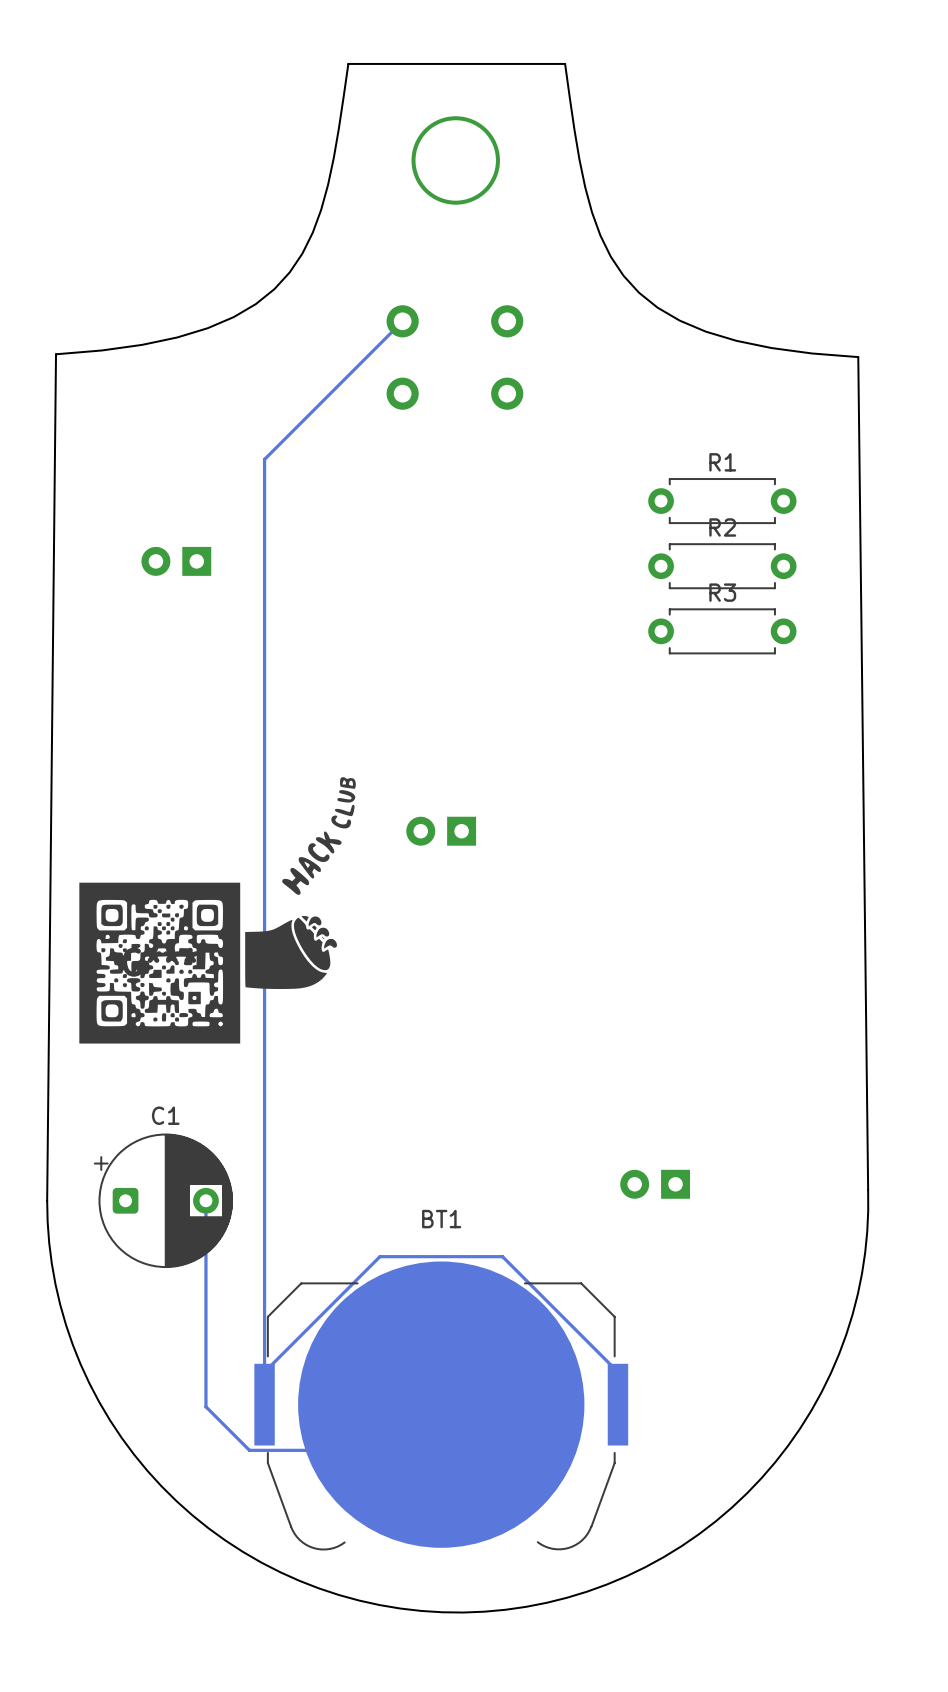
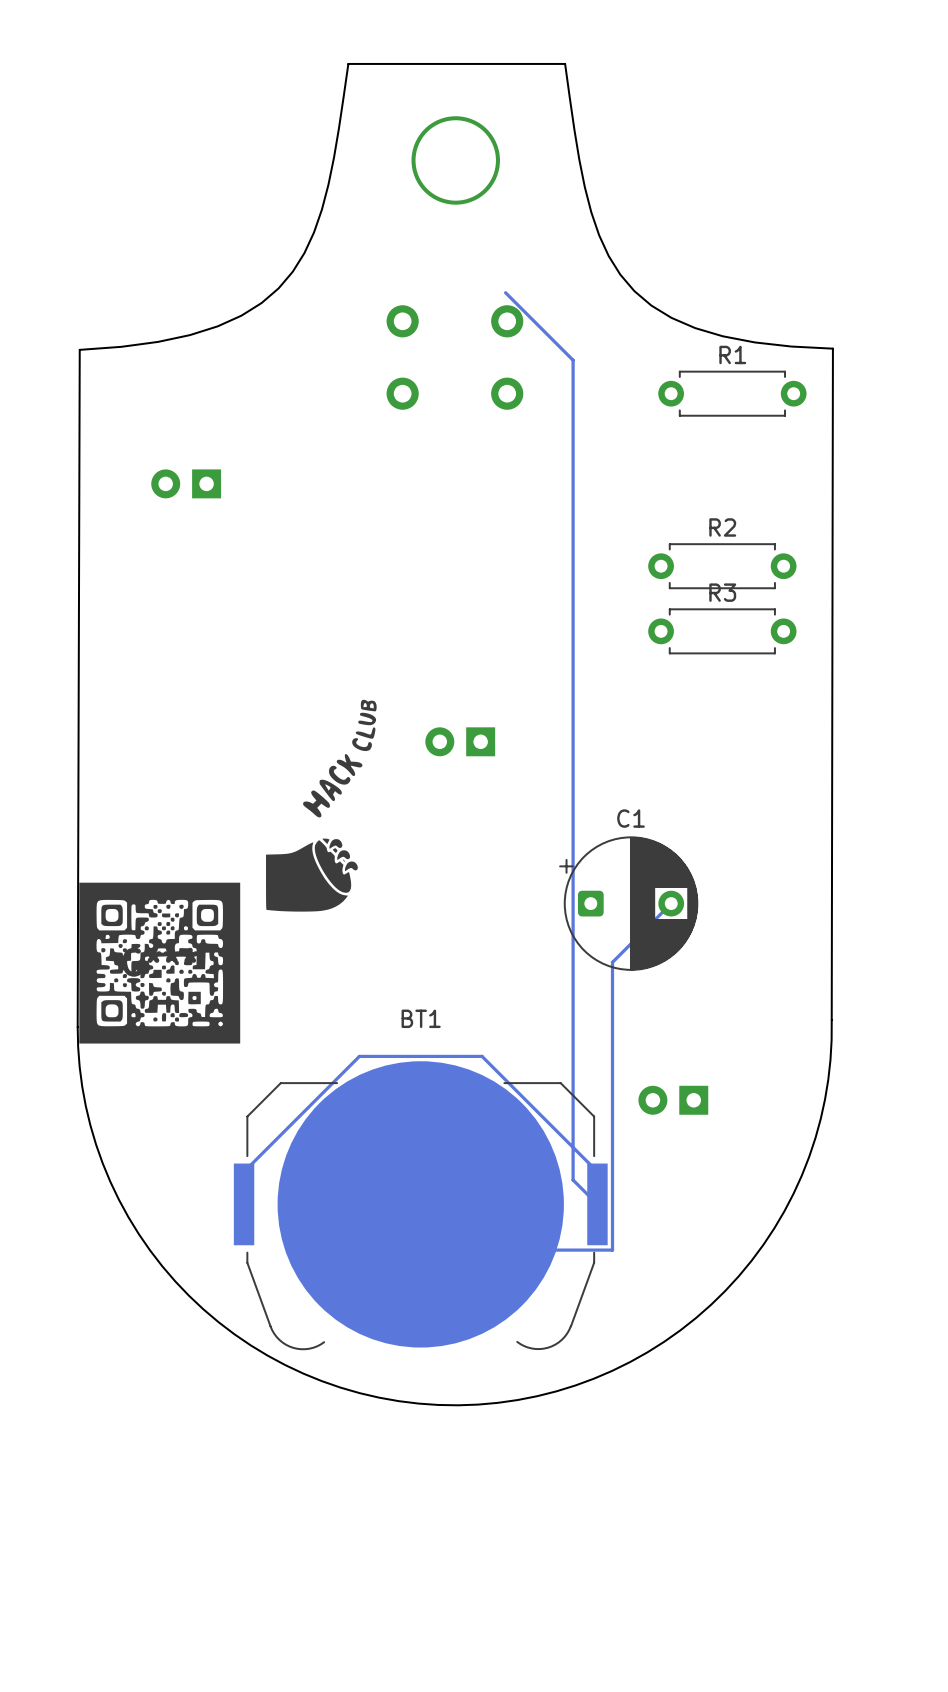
board edge: (565, 63) (579, 159) (592, 212) (610, 256) (623, 275) (638, 292) (657, 307) (679, 320) (705, 331) (736, 340) (812, 353) (858, 357) (867, 1231) (862, 1273) (852, 1314) (839, 1354) (821, 1392) (788, 1445) (761, 1478) (731, 1507) (681, 1546) (645, 1567) (606, 1584) (567, 1597) (526, 1606) (463, 1612) (400, 1608) (359, 1600) (318, 1588) (280, 1572) (243, 1552) (208, 1528) (176, 1501) (147, 1470) (121, 1437) (89, 1383) (66, 1324) (55, 1284) (49, 1242) (47, 1200) (56, 354) (101, 350) (177, 337) (207, 328) (233, 317) (255, 304) (274, 289) (289, 272) (302, 253) (321, 209) (333, 157) (348, 63) -> (831, 1020) (828, 1079) (815, 1137) (793, 1193) (763, 1244) (725, 1290) (680, 1330) (630, 1362) (594, 1378) (556, 1391) (517, 1400) (478, 1404) (418, 1403) (359, 1393) (303, 1373) (250, 1345) (218, 1322) (188, 1295) (150, 1250) (118, 1199) (102, 1163) (90, 1125) (82, 1086) (78, 1047) (79, 349) (121, 346) (190, 335) (217, 326) (241, 315) (261, 303) (278, 288) (292, 271) (304, 253) (321, 209) (333, 157) (348, 63)
board edge: none -> (565, 63) (579, 159) (591, 212) (608, 255) (620, 274) (634, 291) (651, 305) (671, 317) (695, 328) (722, 336) (791, 346) (832, 348) (831, 1020)
track: none -> (505, 292) (573, 360) (573, 1180) (597, 1204) (597, 1171) (482, 1056) (359, 1056) (244, 1171) (244, 1204)
track: (402, 321) (264, 459) (264, 1404) -> none
R1 position: (722, 501) -> (732, 393)
part position: (176, 561) -> (186, 483)
part position: (441, 831) -> (460, 741)
drawing position: (300, 883) -> (321, 805)
track: none -> (671, 903) (612, 962) (612, 1250) (466, 1250) (420, 1204)
part position: (655, 1184) -> (673, 1100)
C1 position: (163, 1200) -> (628, 903)
track: (205, 1200) (205, 1406) (249, 1450) (395, 1450) (441, 1404) -> none
track: (617, 1372) (502, 1256) (379, 1256) (264, 1372) -> none
BT1 position: (441, 1405) -> (420, 1205)

